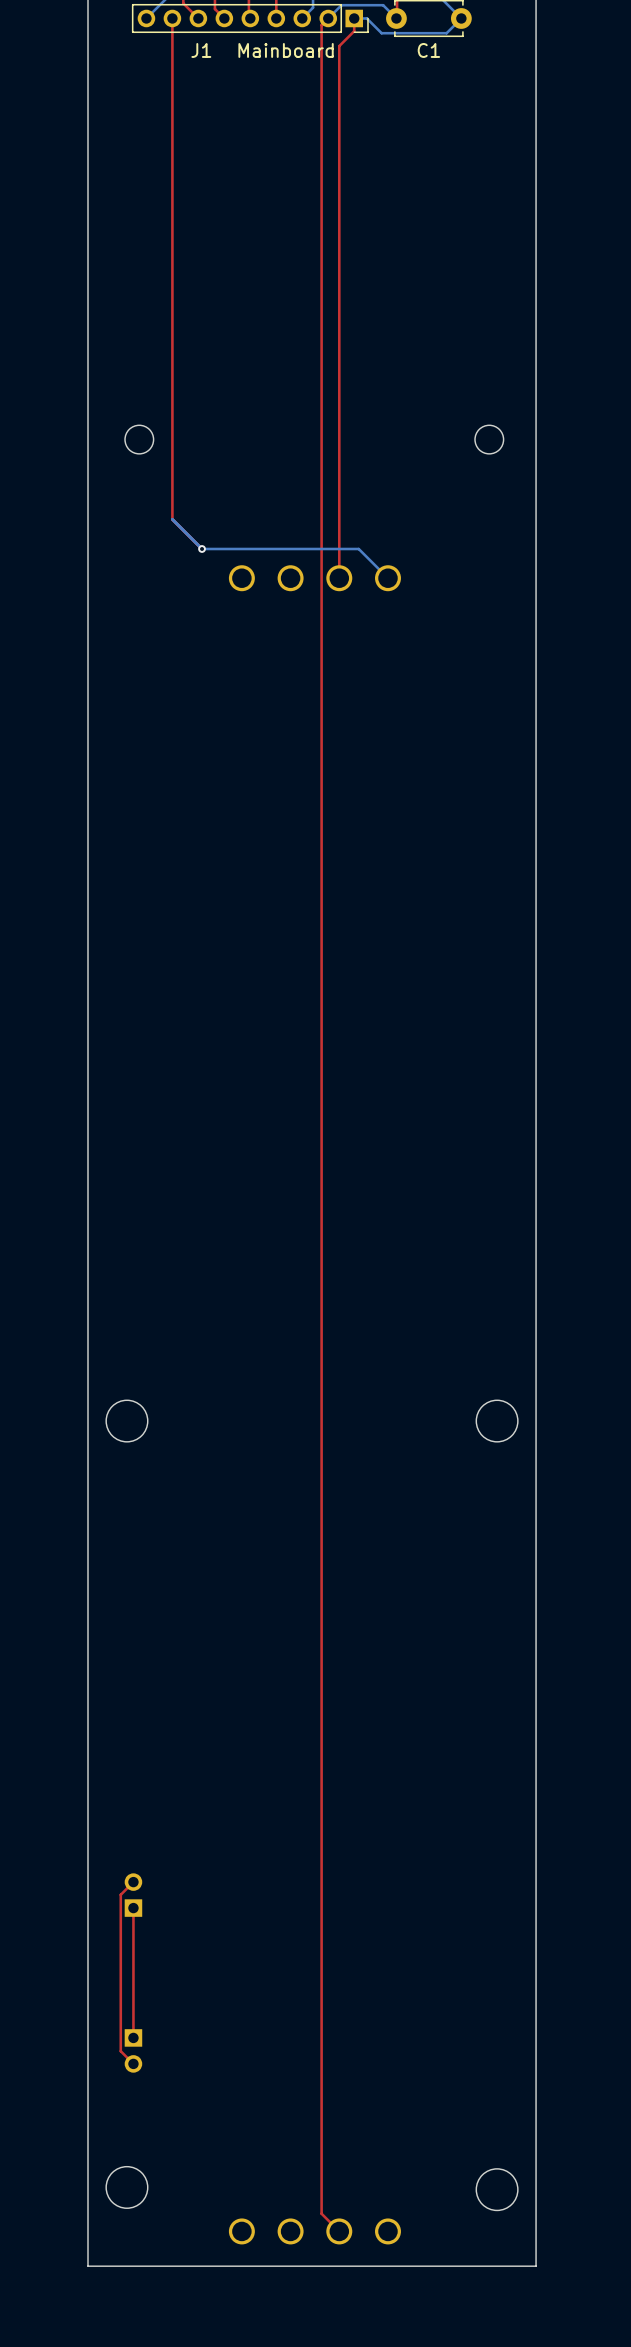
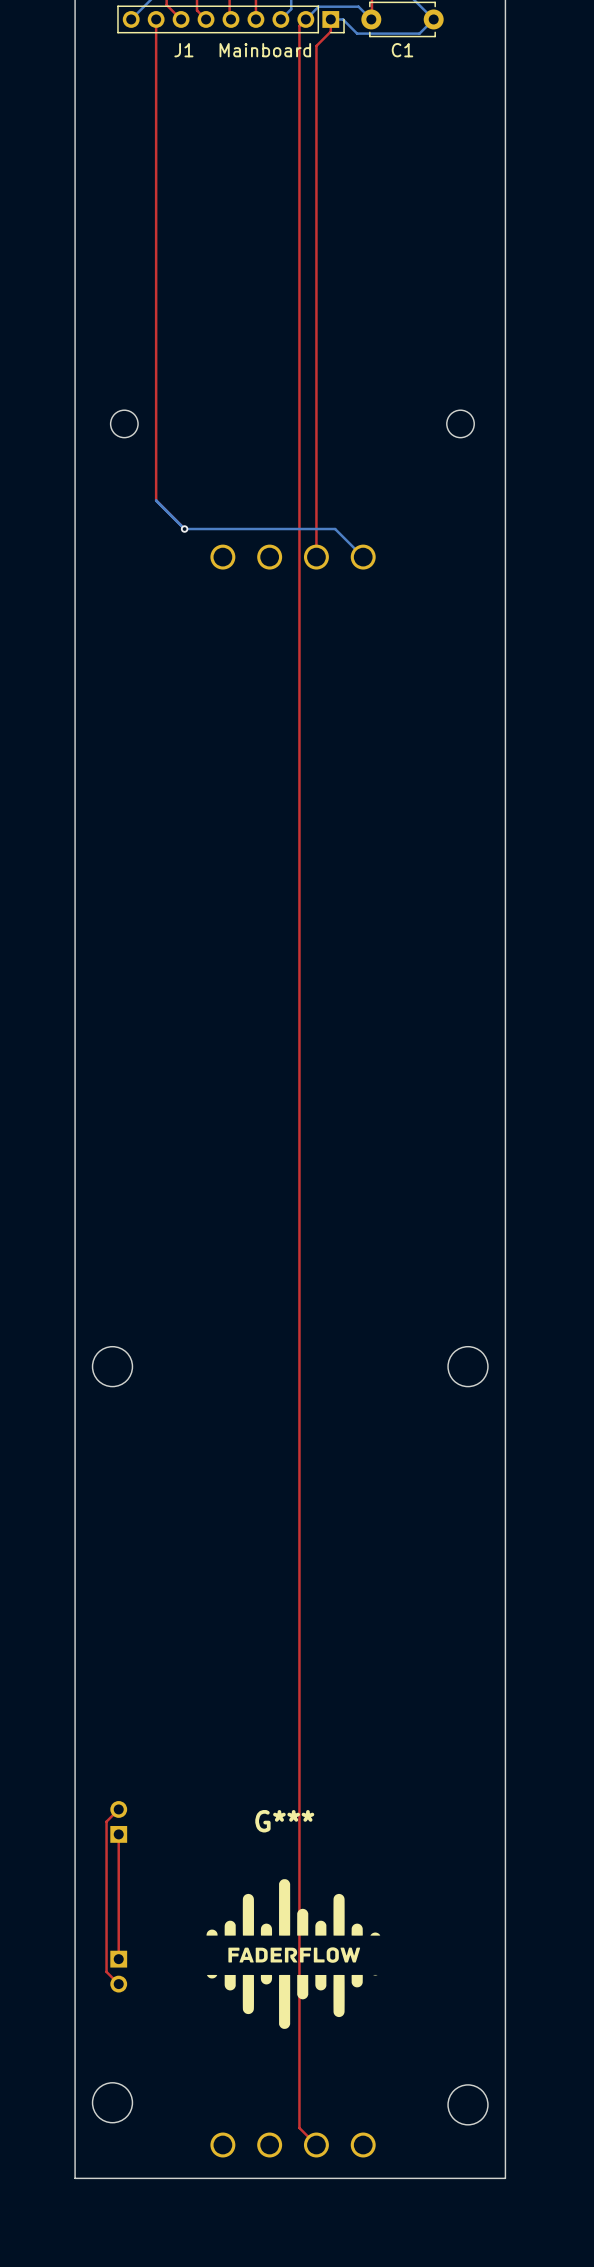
G***: none -> (293, 1954)

